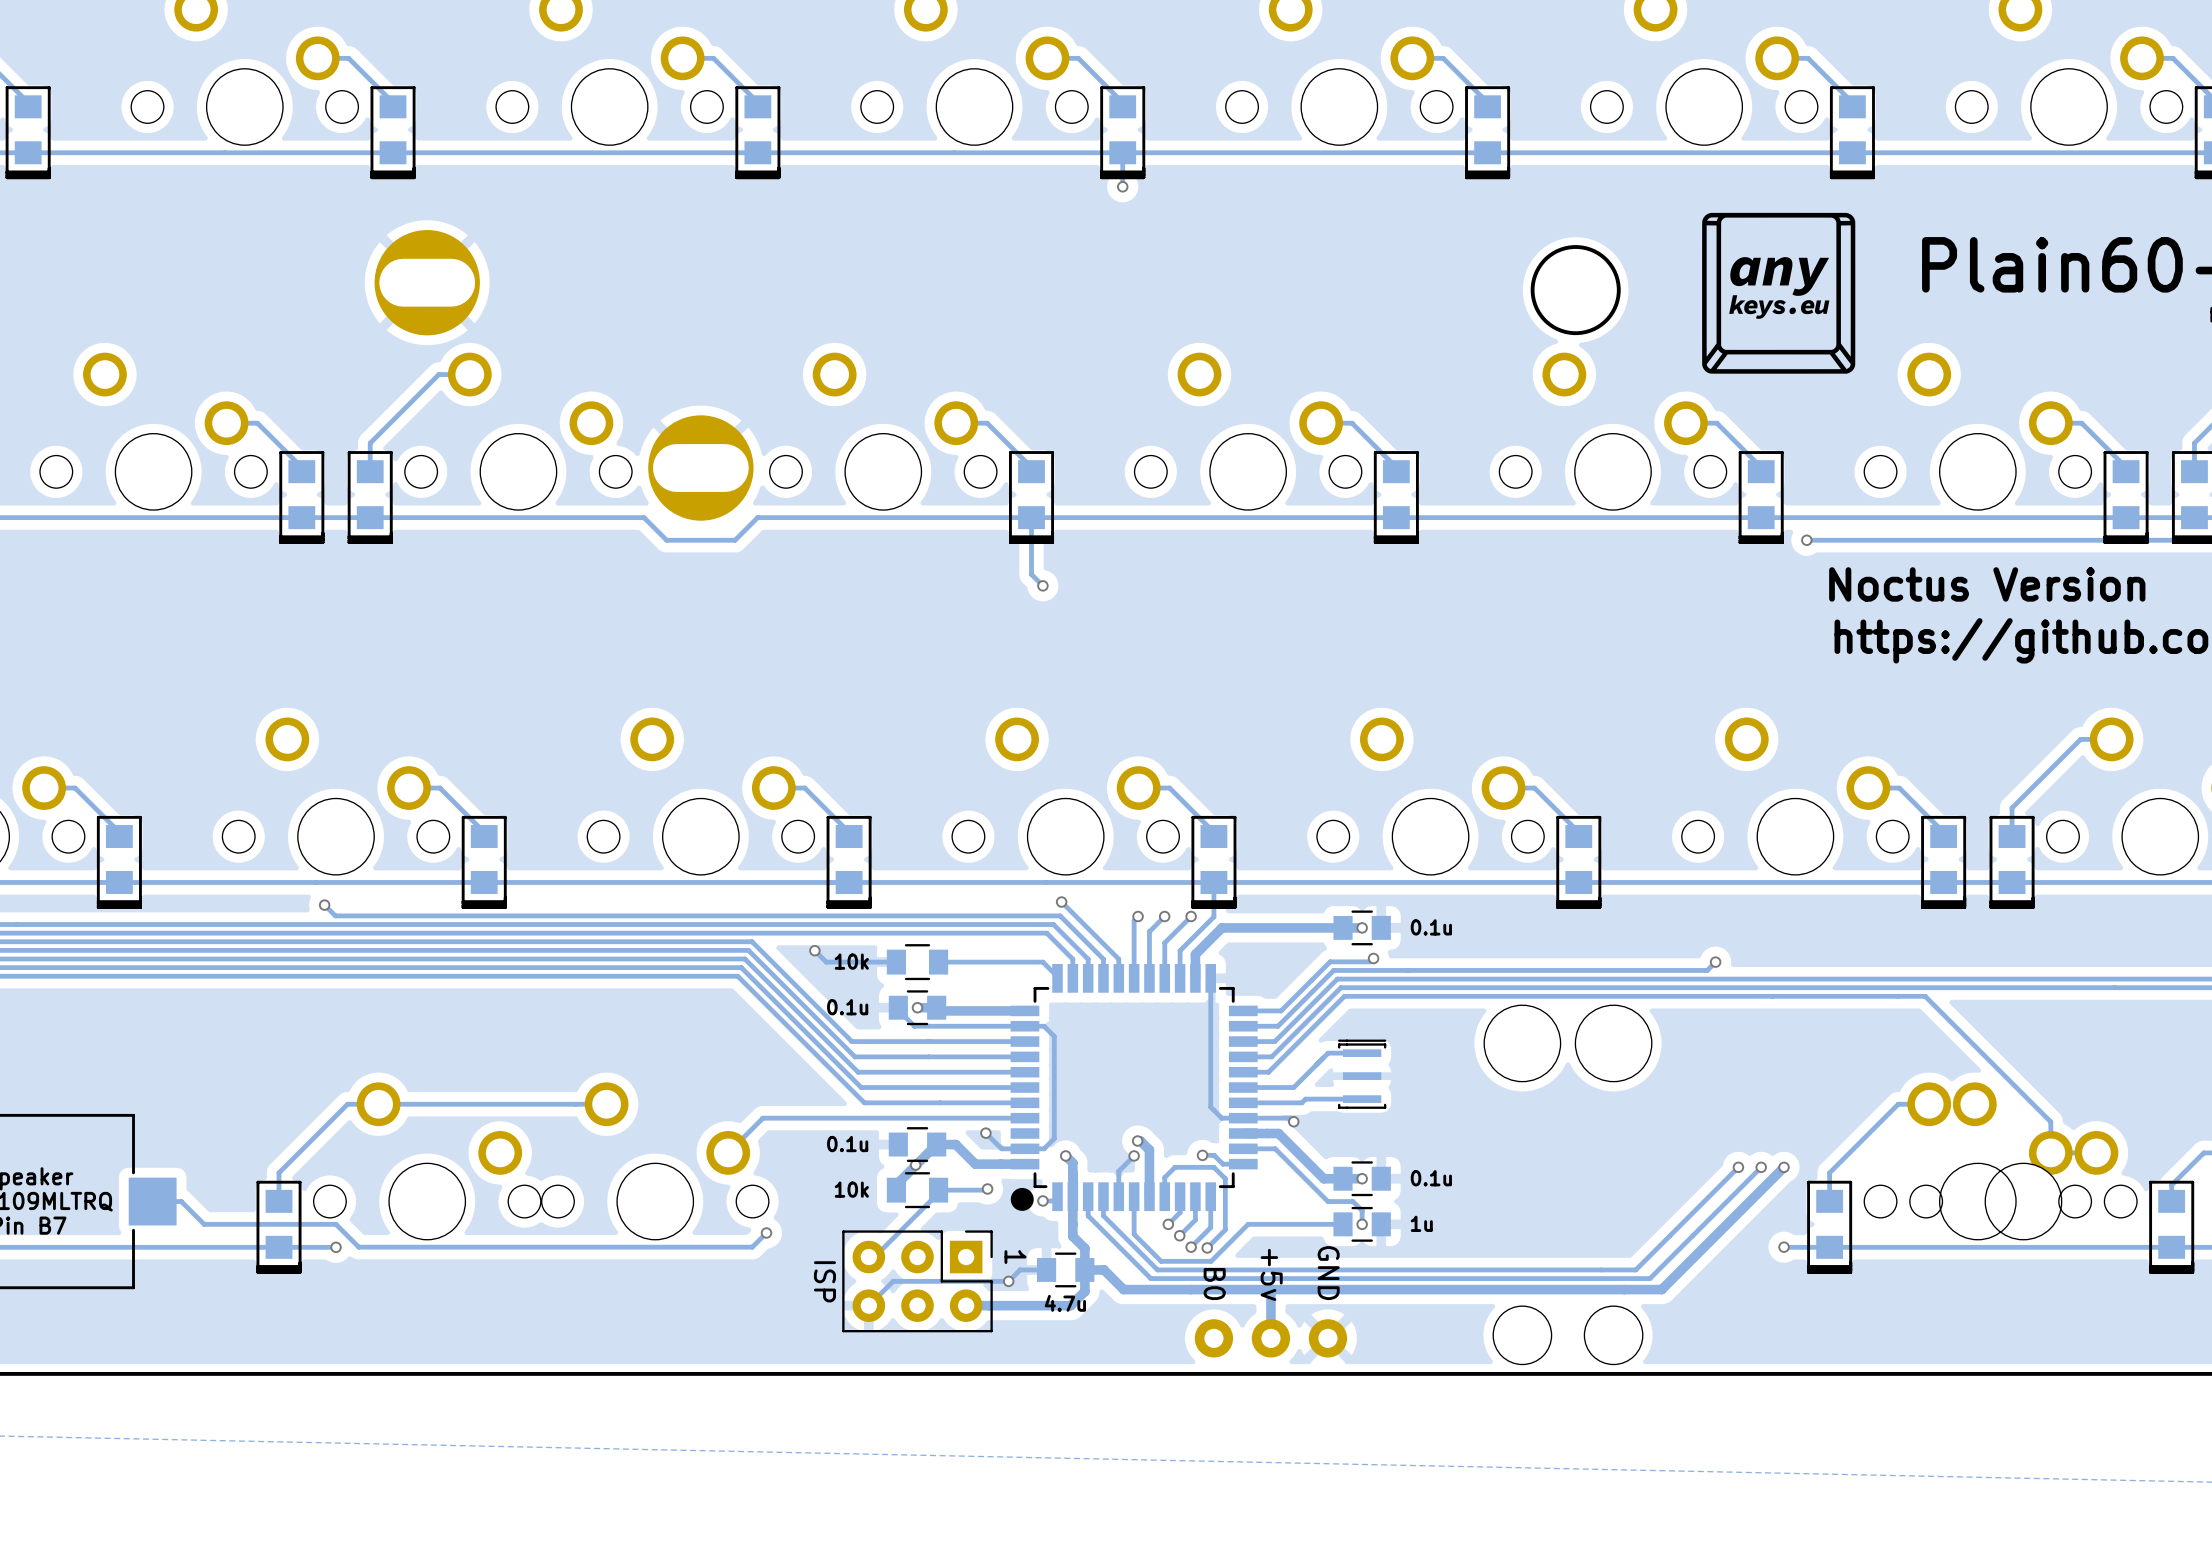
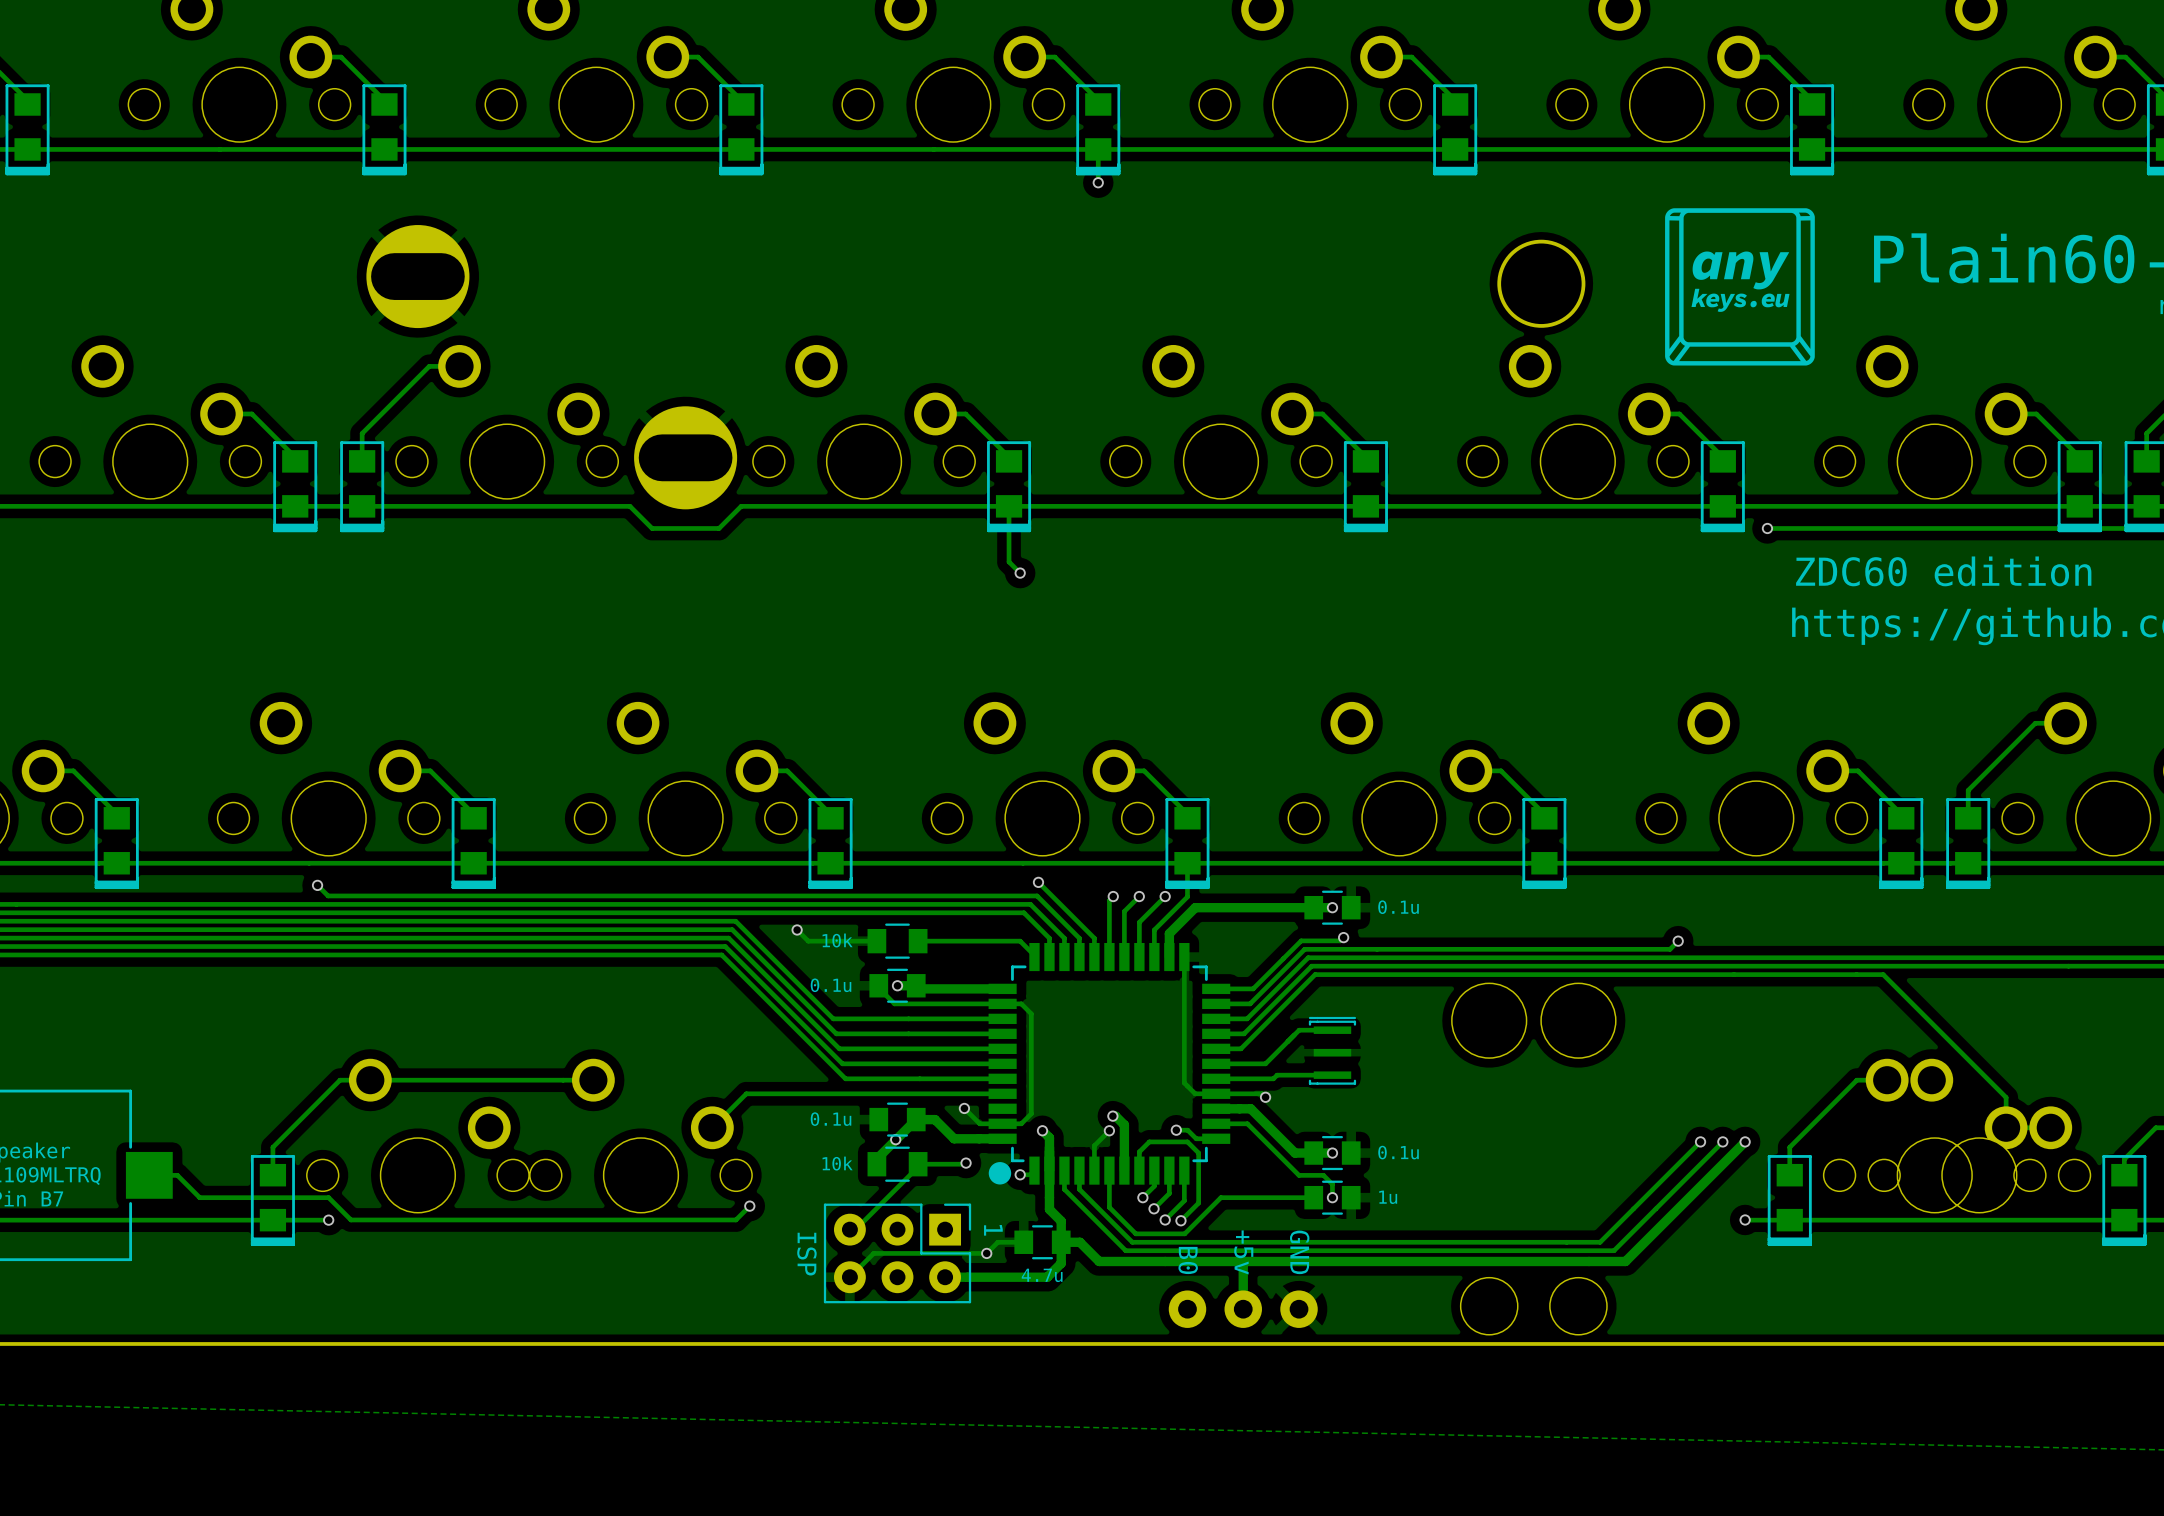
text: Noctus Version (1987, 584) -> ZDC60 edition (1943, 571)

